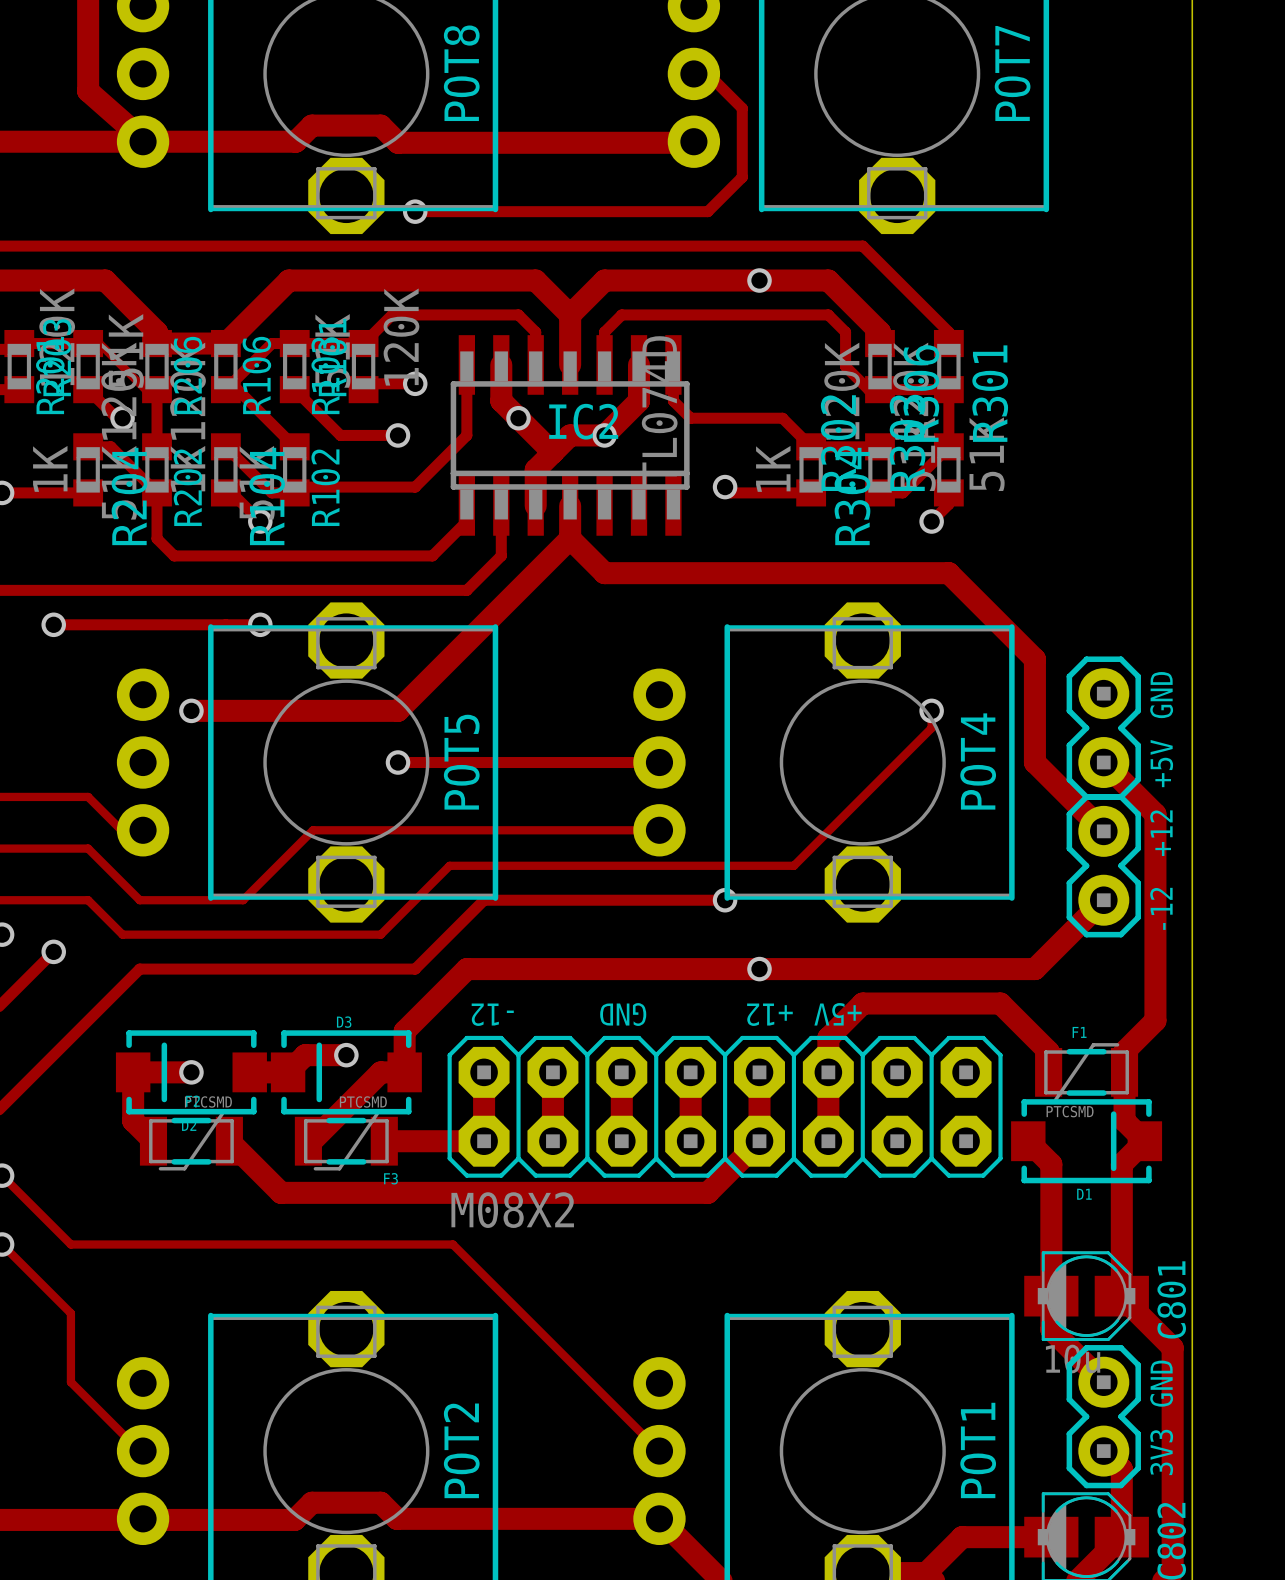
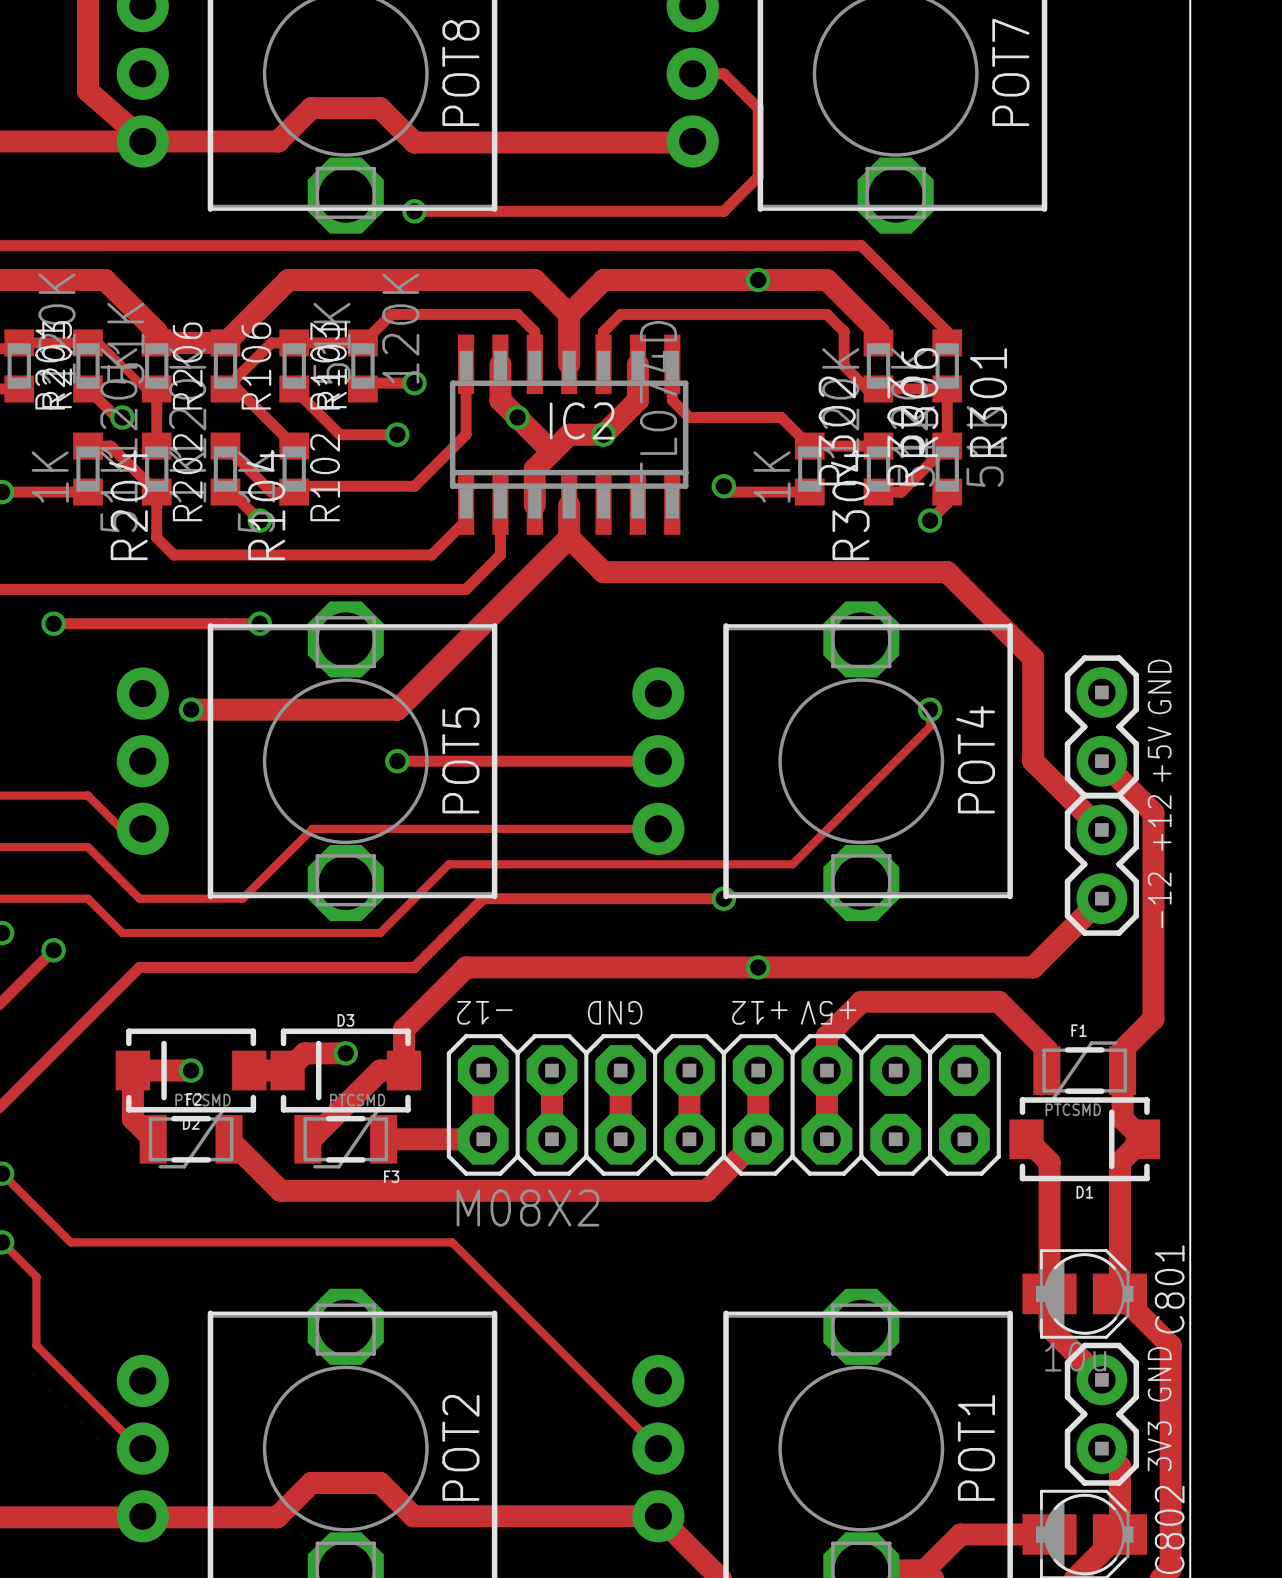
track: (707, 73) (742, 108) (742, 177) (707, 211) -> (706, 73) (723, 73) (758, 108) (758, 176) (723, 211) (706, 211)
track: (278, 141) (295, 141) (311, 125) (380, 125) (398, 142) (415, 142) -> (278, 141) (311, 108) (380, 108) (414, 142)
track: (36, 1278) (70, 1313) (70, 1382) -> (36, 1276) (36, 1345) (70, 1379)
track: (414, 1518) (396, 1518) (380, 1502) (311, 1502) (294, 1519) (277, 1519) -> (413, 1516) (380, 1482) (311, 1482) (277, 1517)

